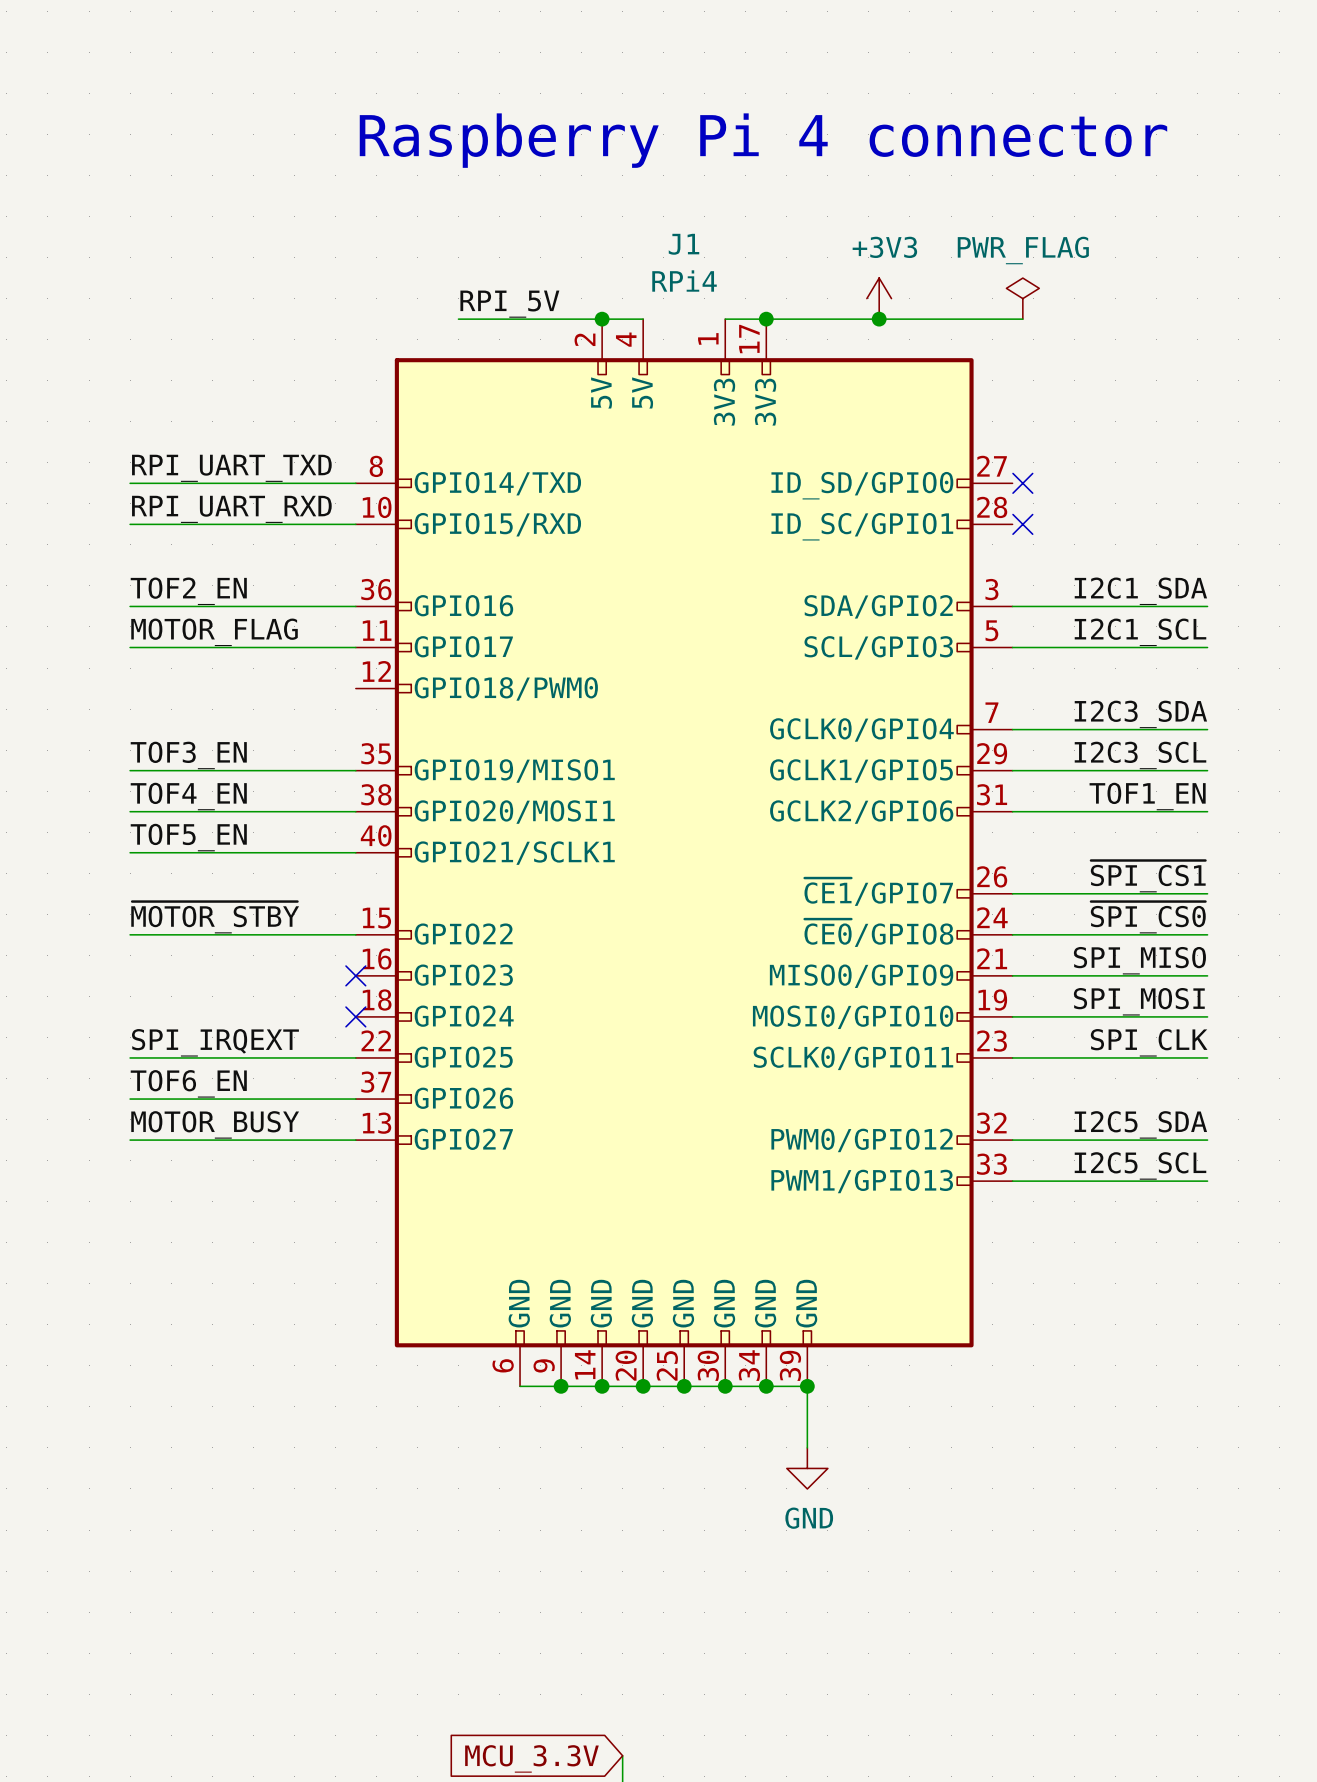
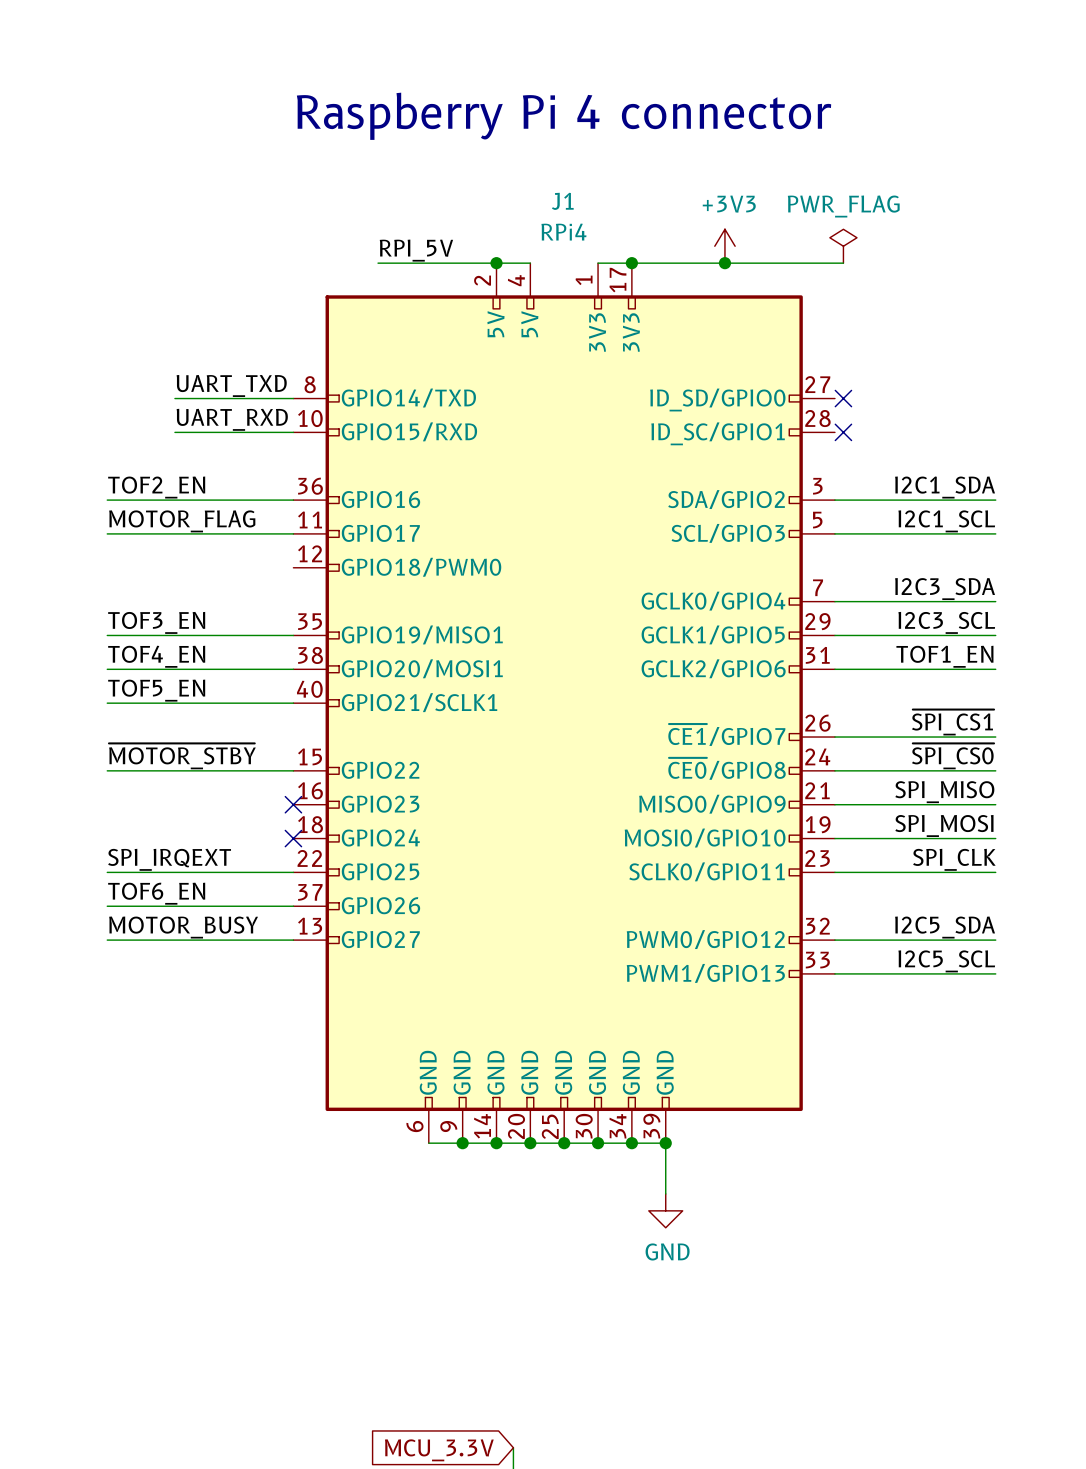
label: RPI_UART_TXD (231, 468) -> none
label: none -> UART_TXD (231, 385)
wire: (130, 483) (212, 483) -> none
label: RPI_UART_RXD (231, 509) -> none
label: none -> UART_RXD (232, 419)
wire: (130, 524) (212, 524) -> none

